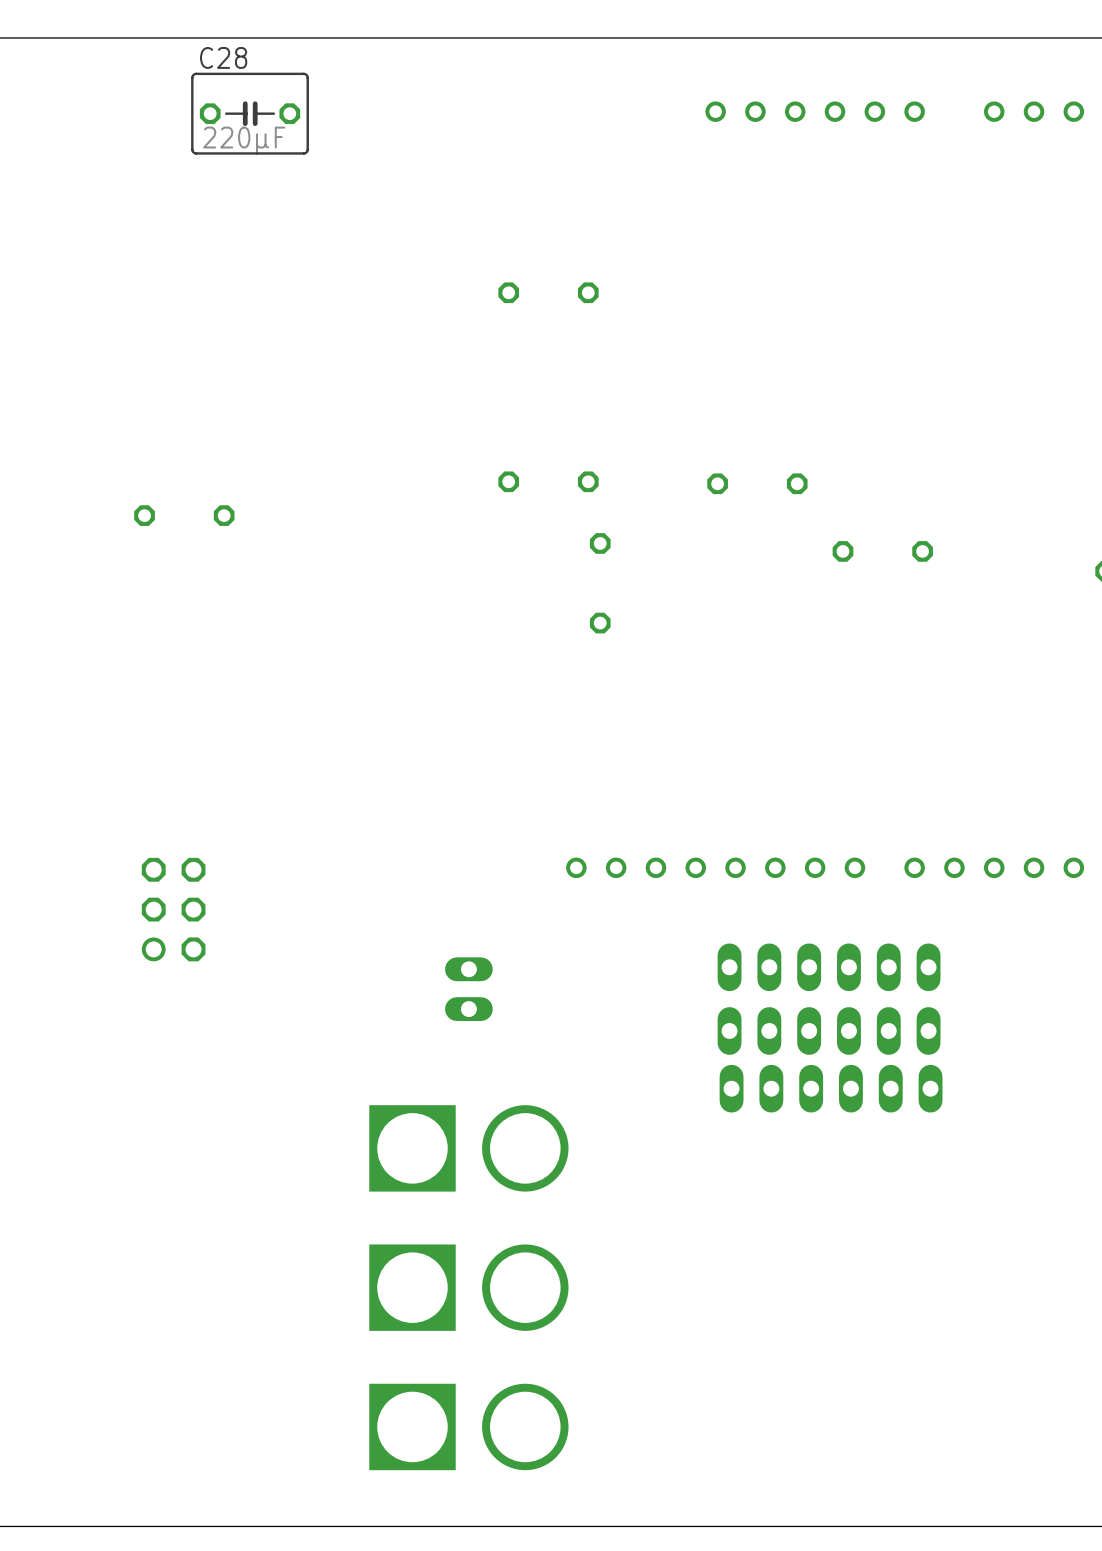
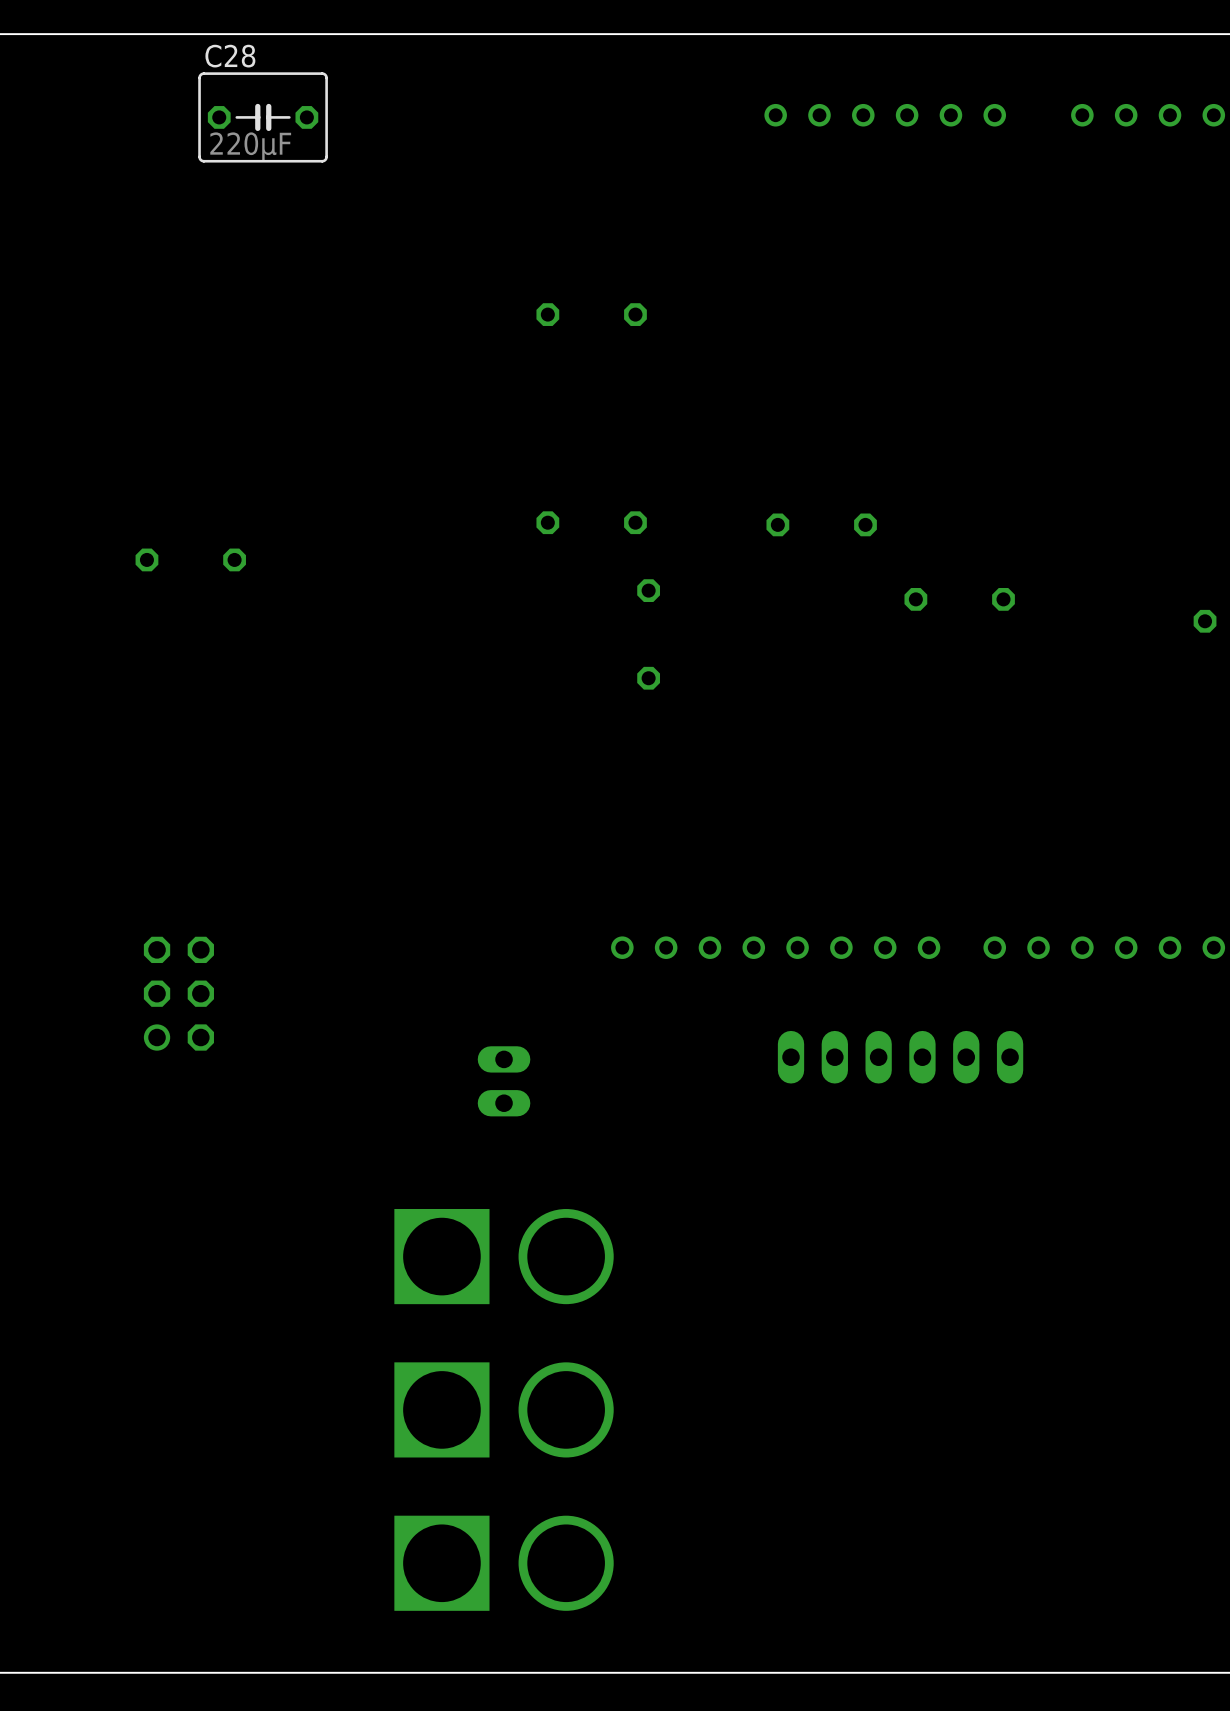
part: (829, 1030) -> none
part: (831, 1088) -> none

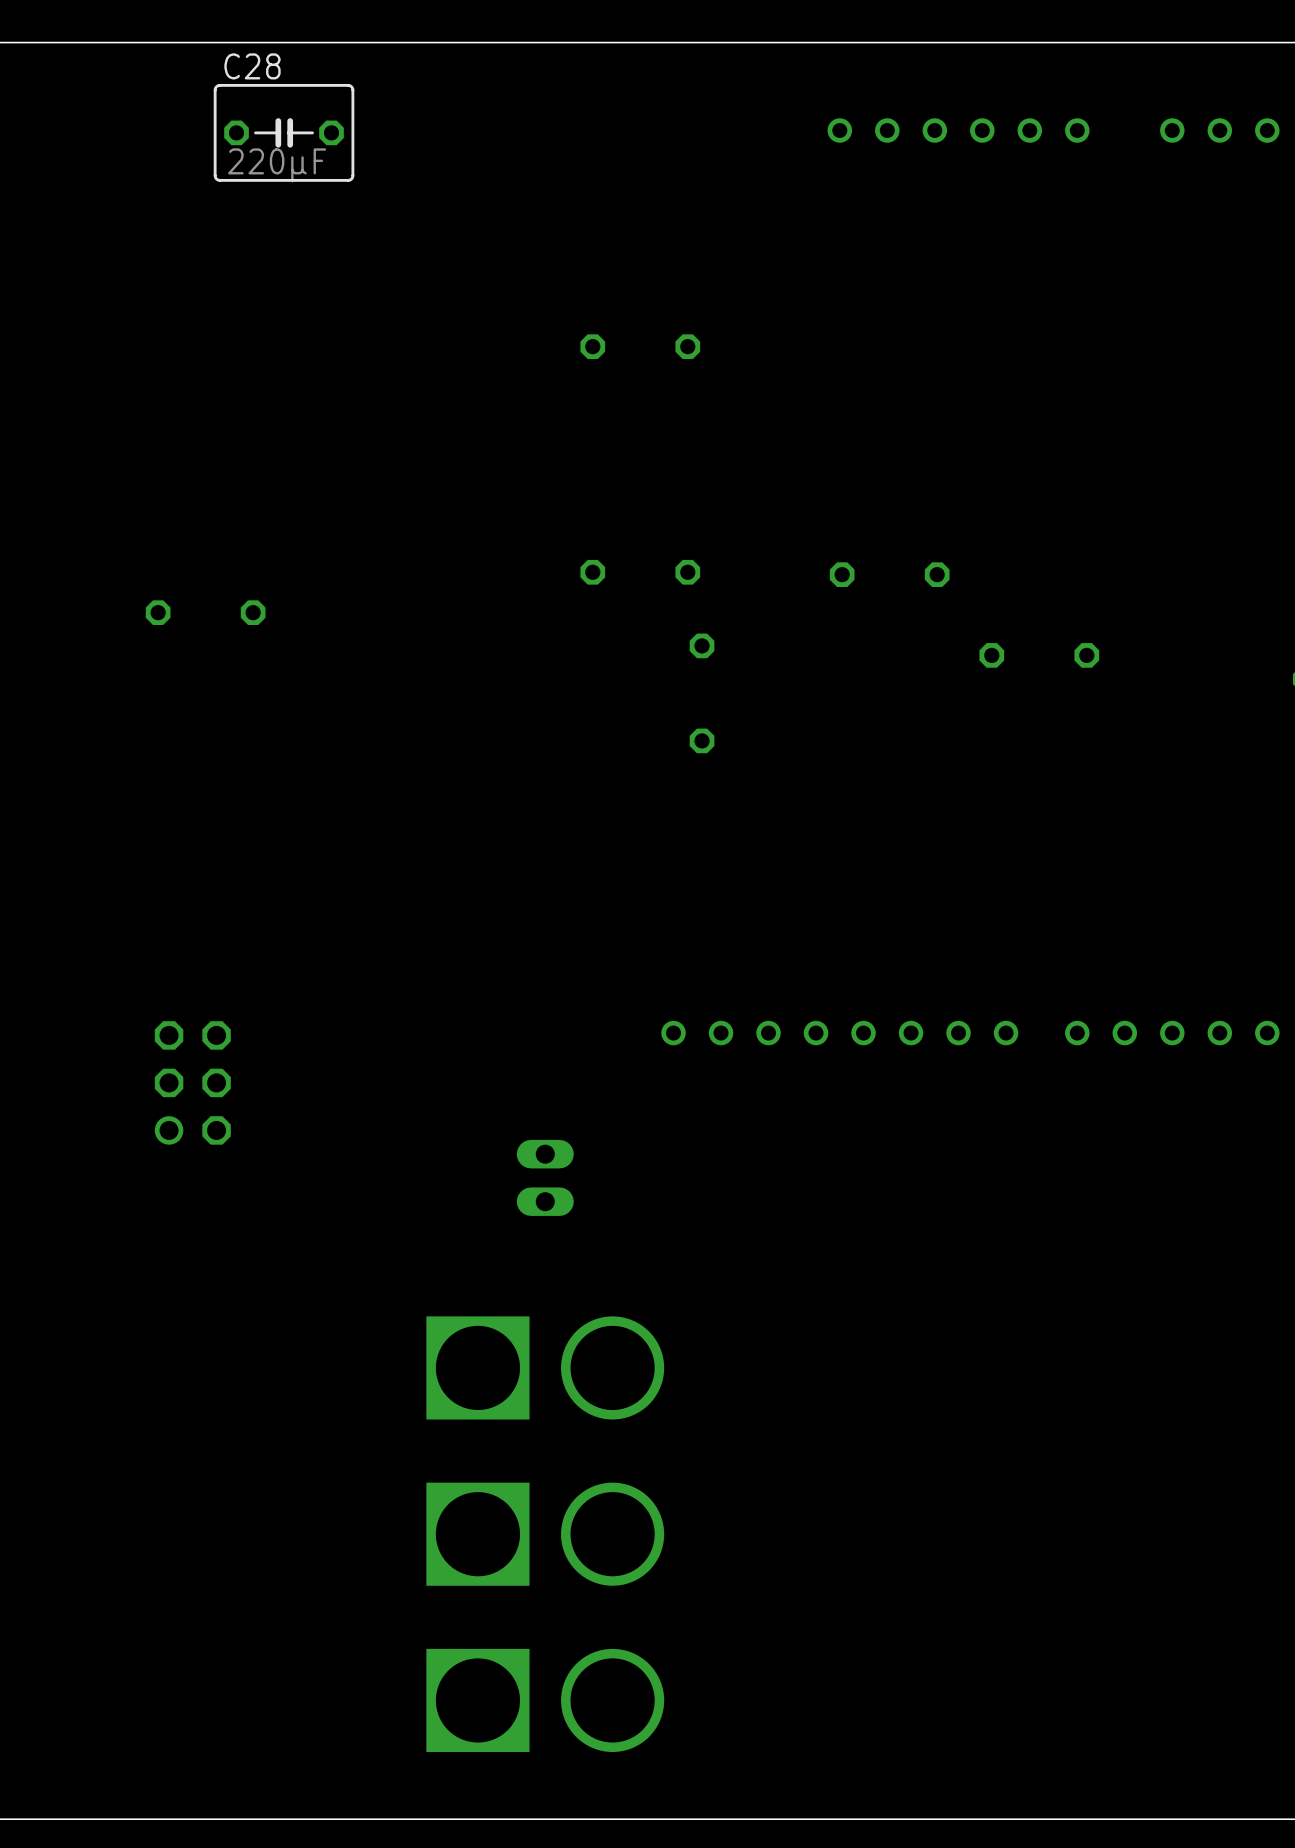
part: (900, 1057) -> none

